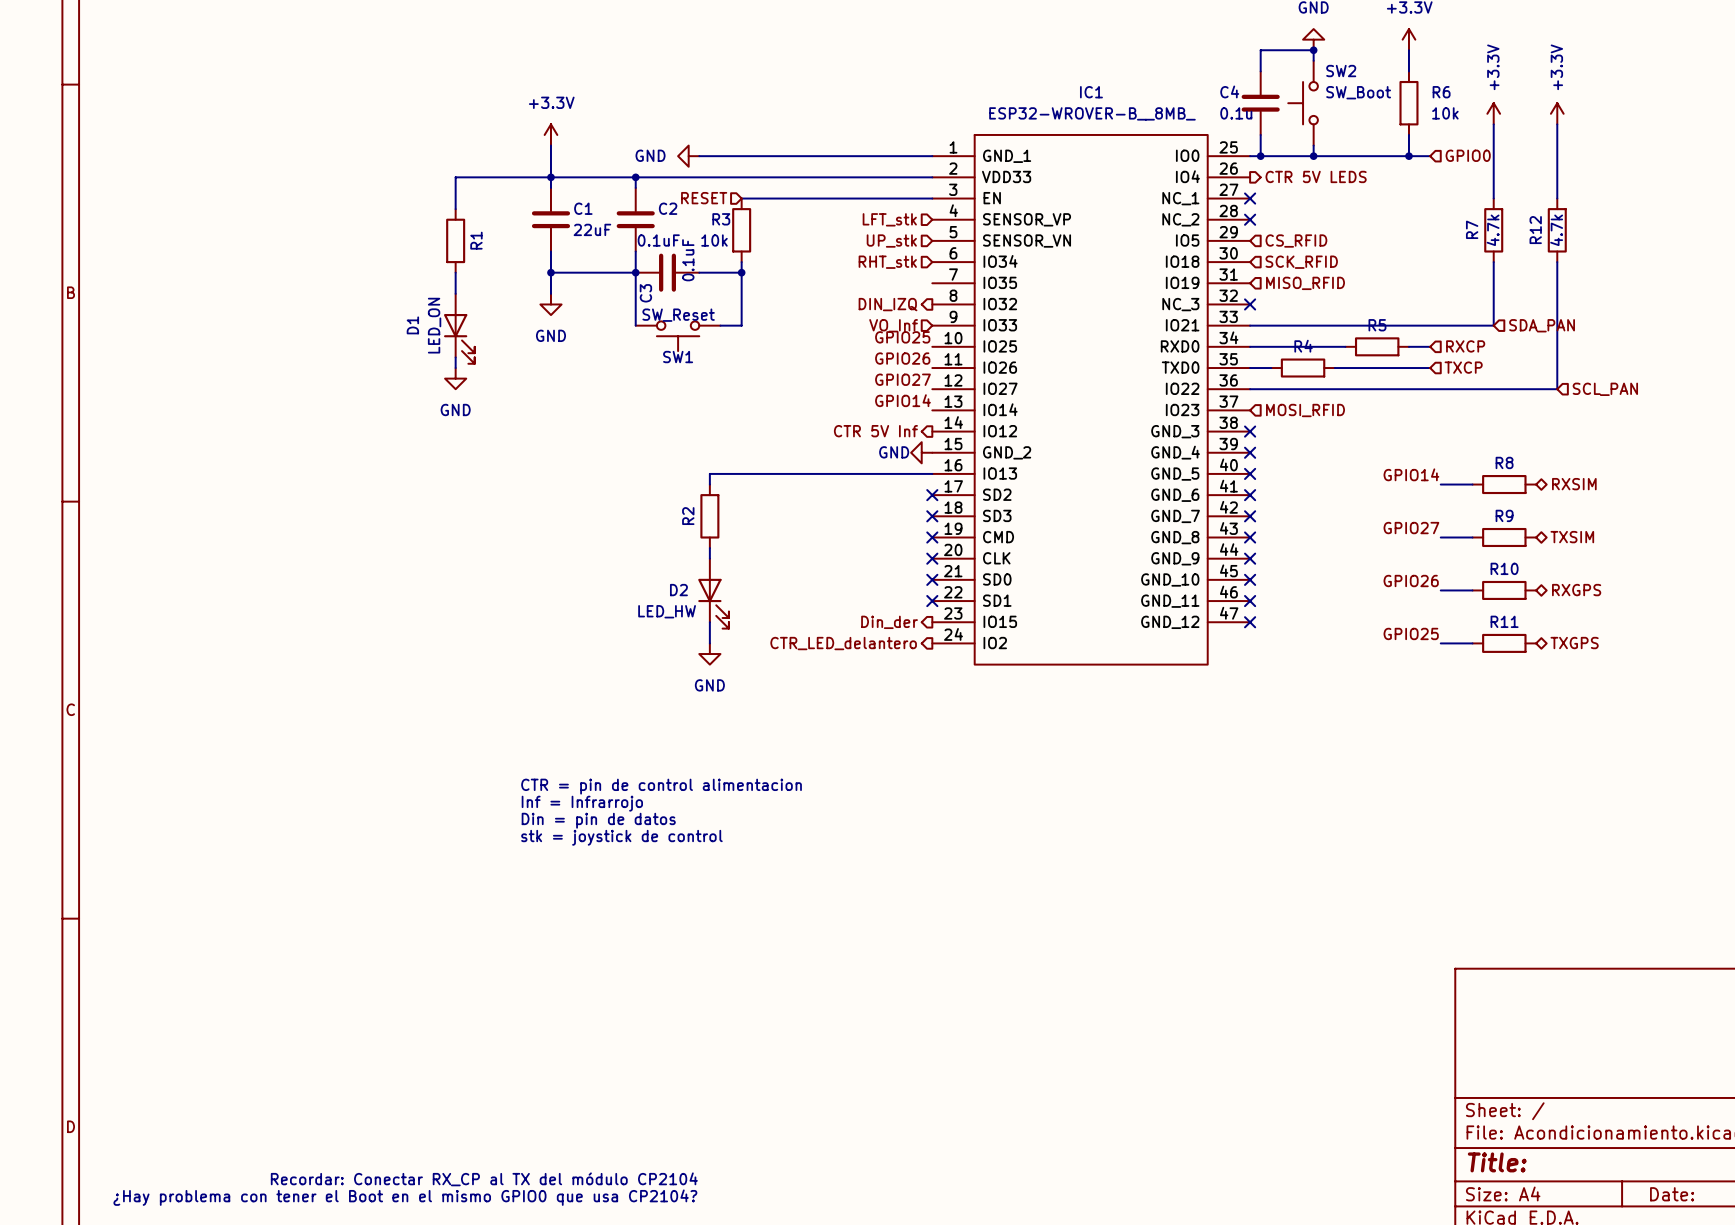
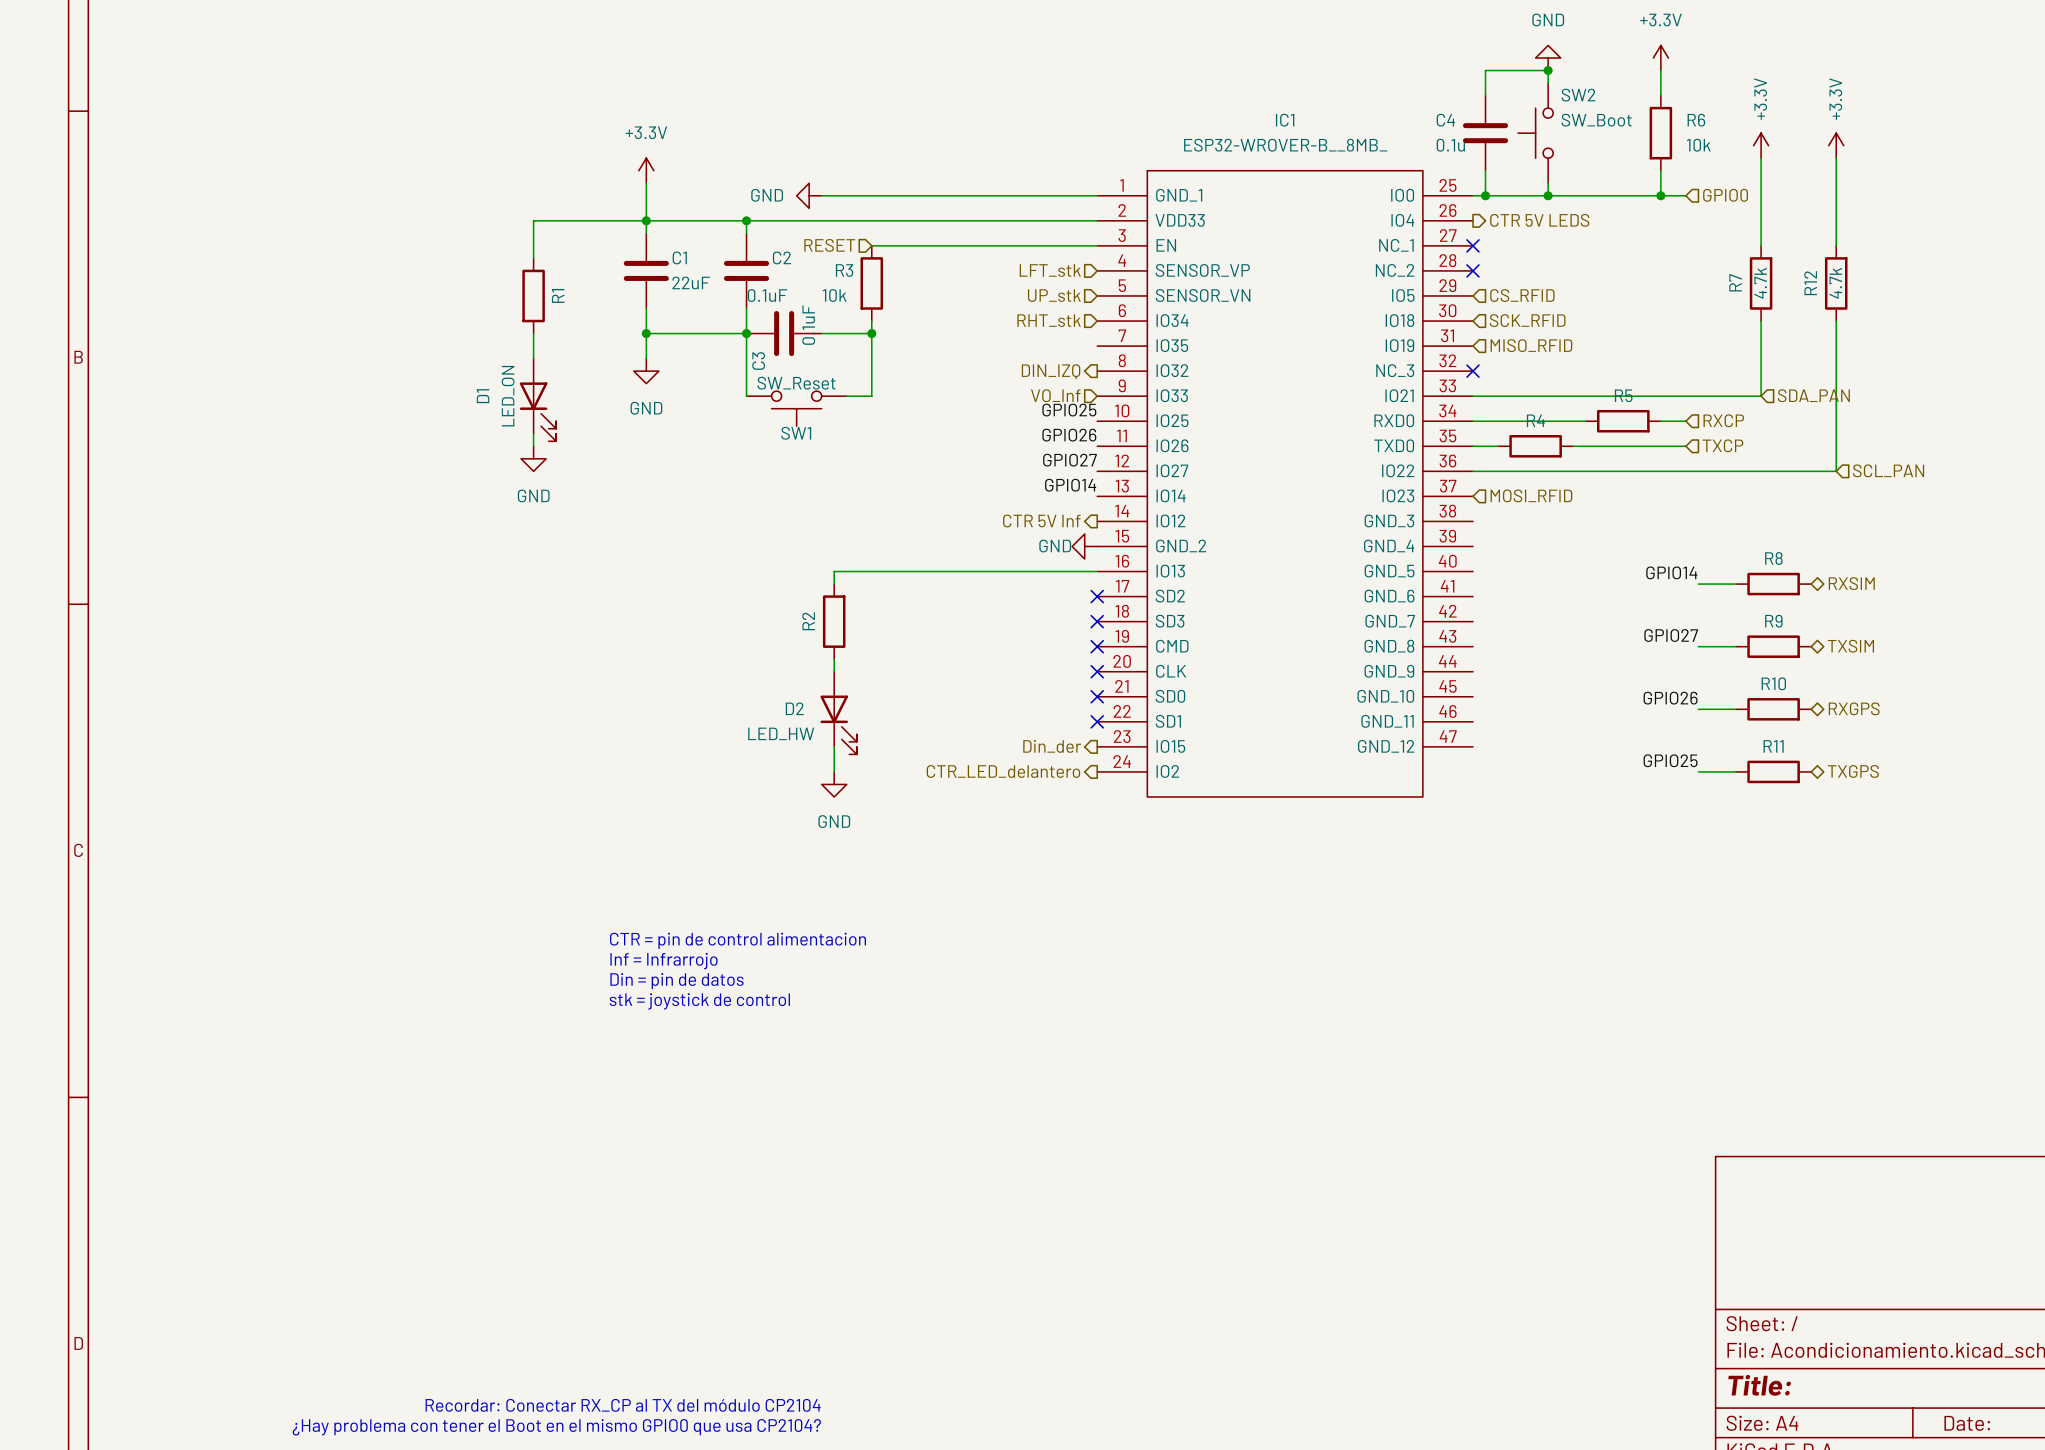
no-connect mark: (1250, 431) -> none
no-connect mark: (1250, 452) -> none
no-connect mark: (1250, 473) -> none
no-connect mark: (1250, 495) -> none
no-connect mark: (1250, 516) -> none
no-connect mark: (1250, 537) -> none
no-connect mark: (1250, 558) -> none
no-connect mark: (1250, 579) -> none
no-connect mark: (1250, 601) -> none
no-connect mark: (1250, 622) -> none

